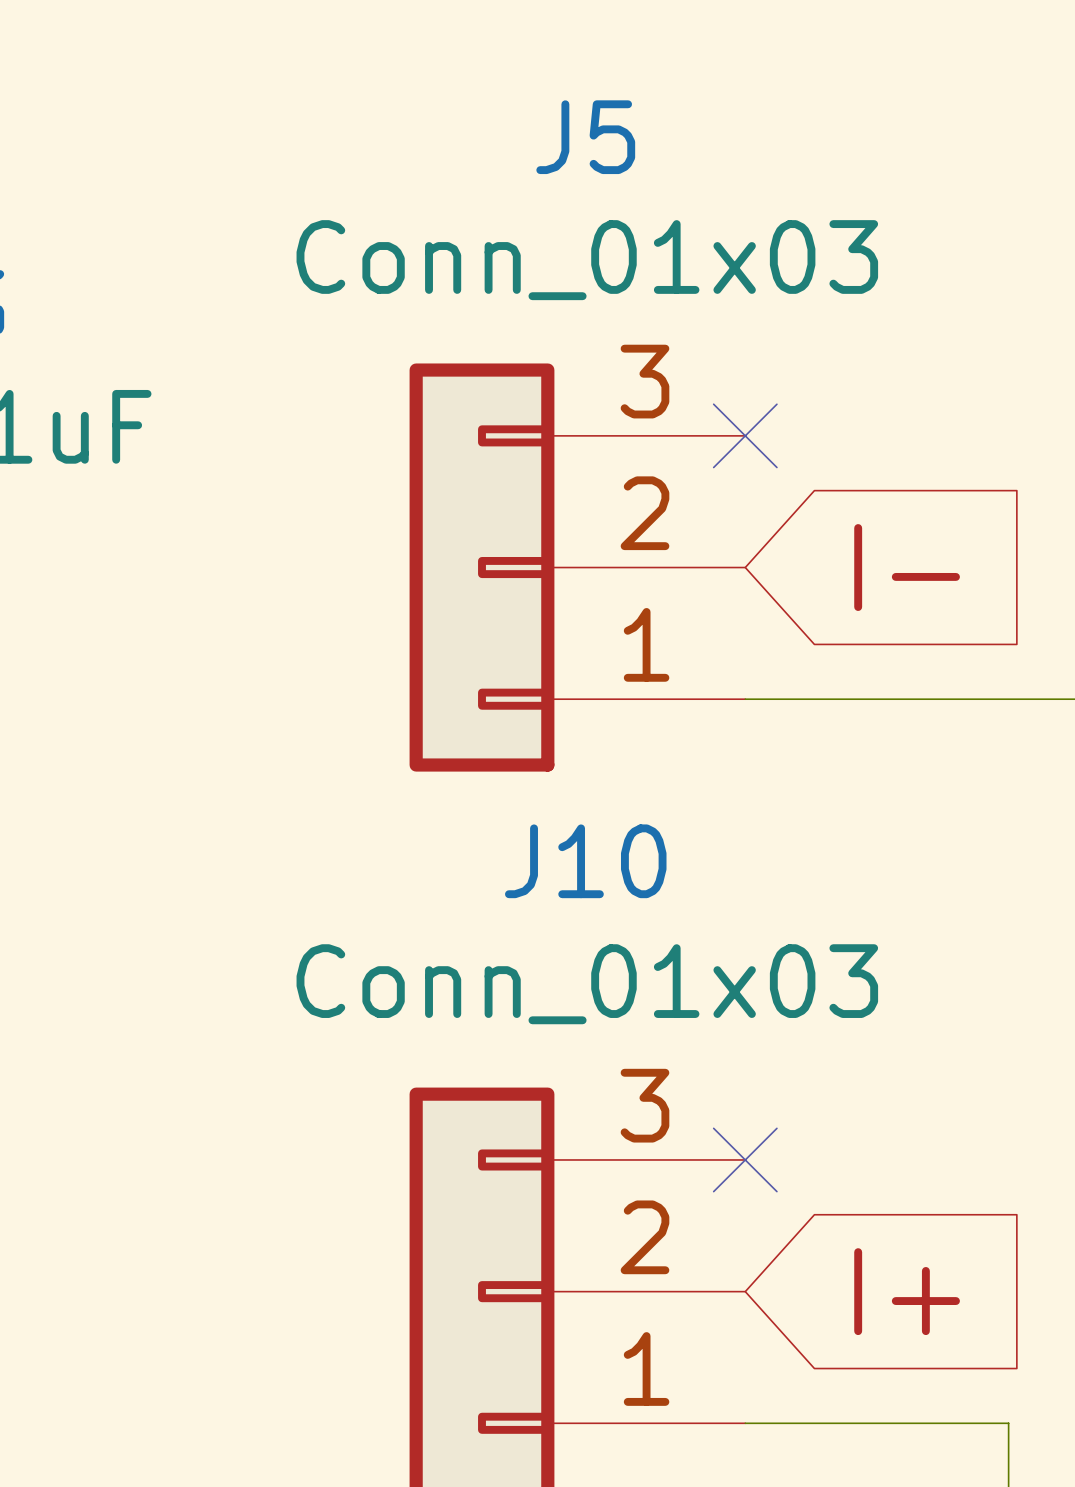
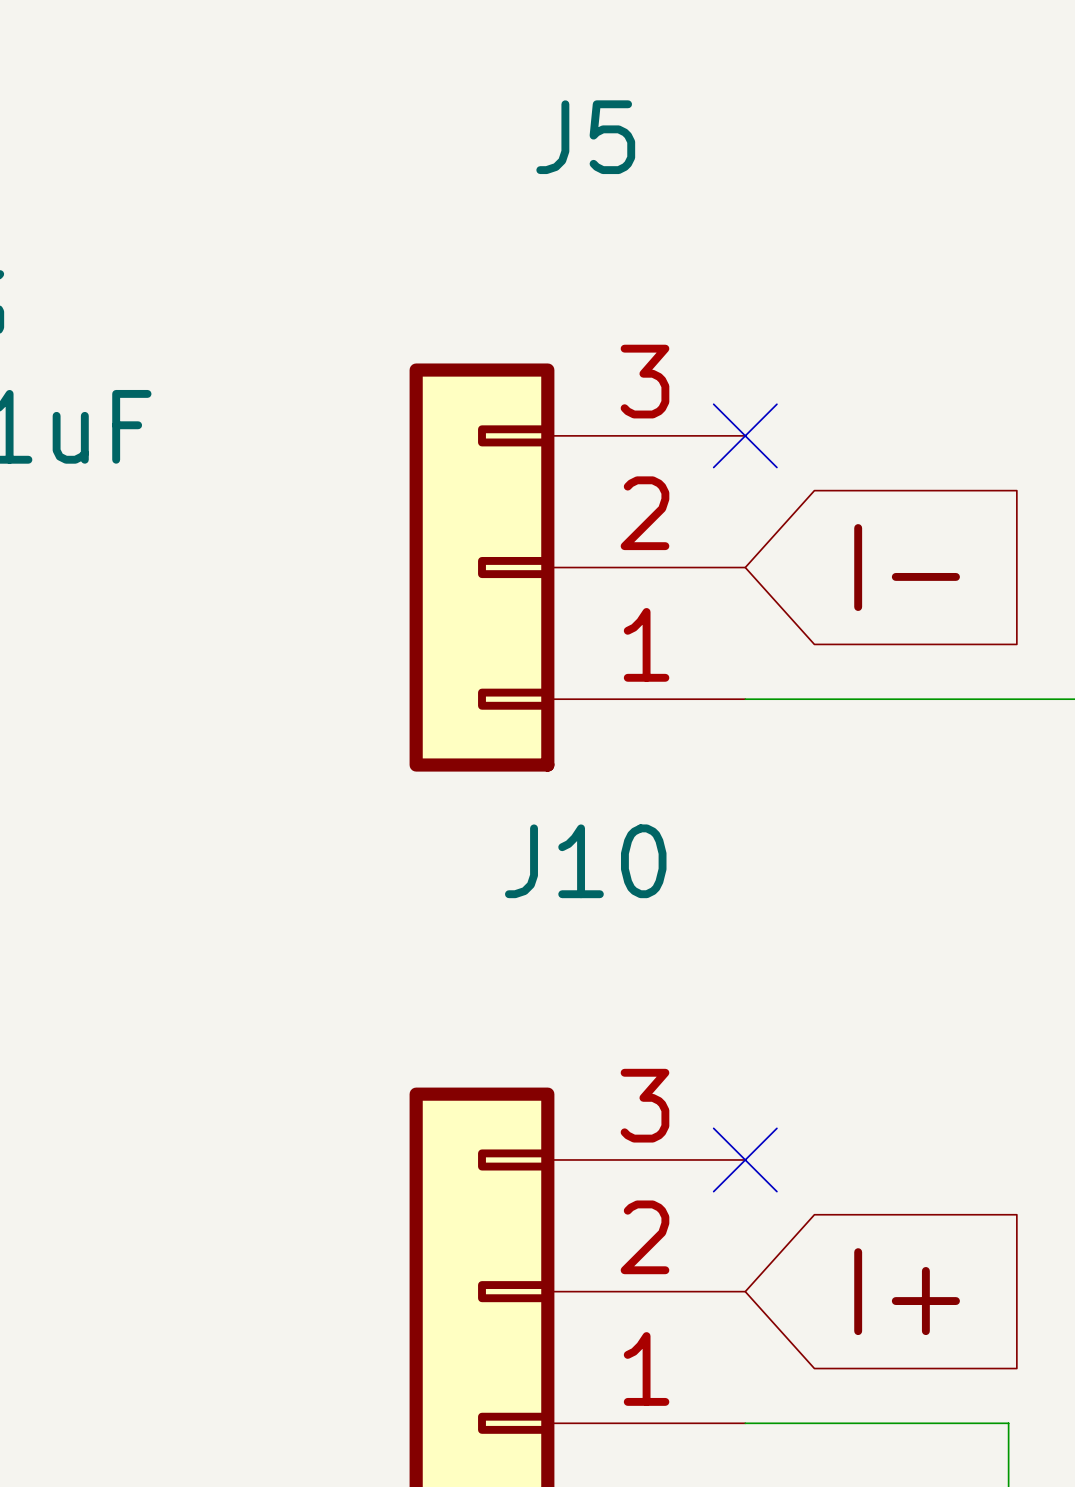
J5 value: Conn_01x03 (587, 260) -> none
J10 value: Conn_01x03 (587, 984) -> none

